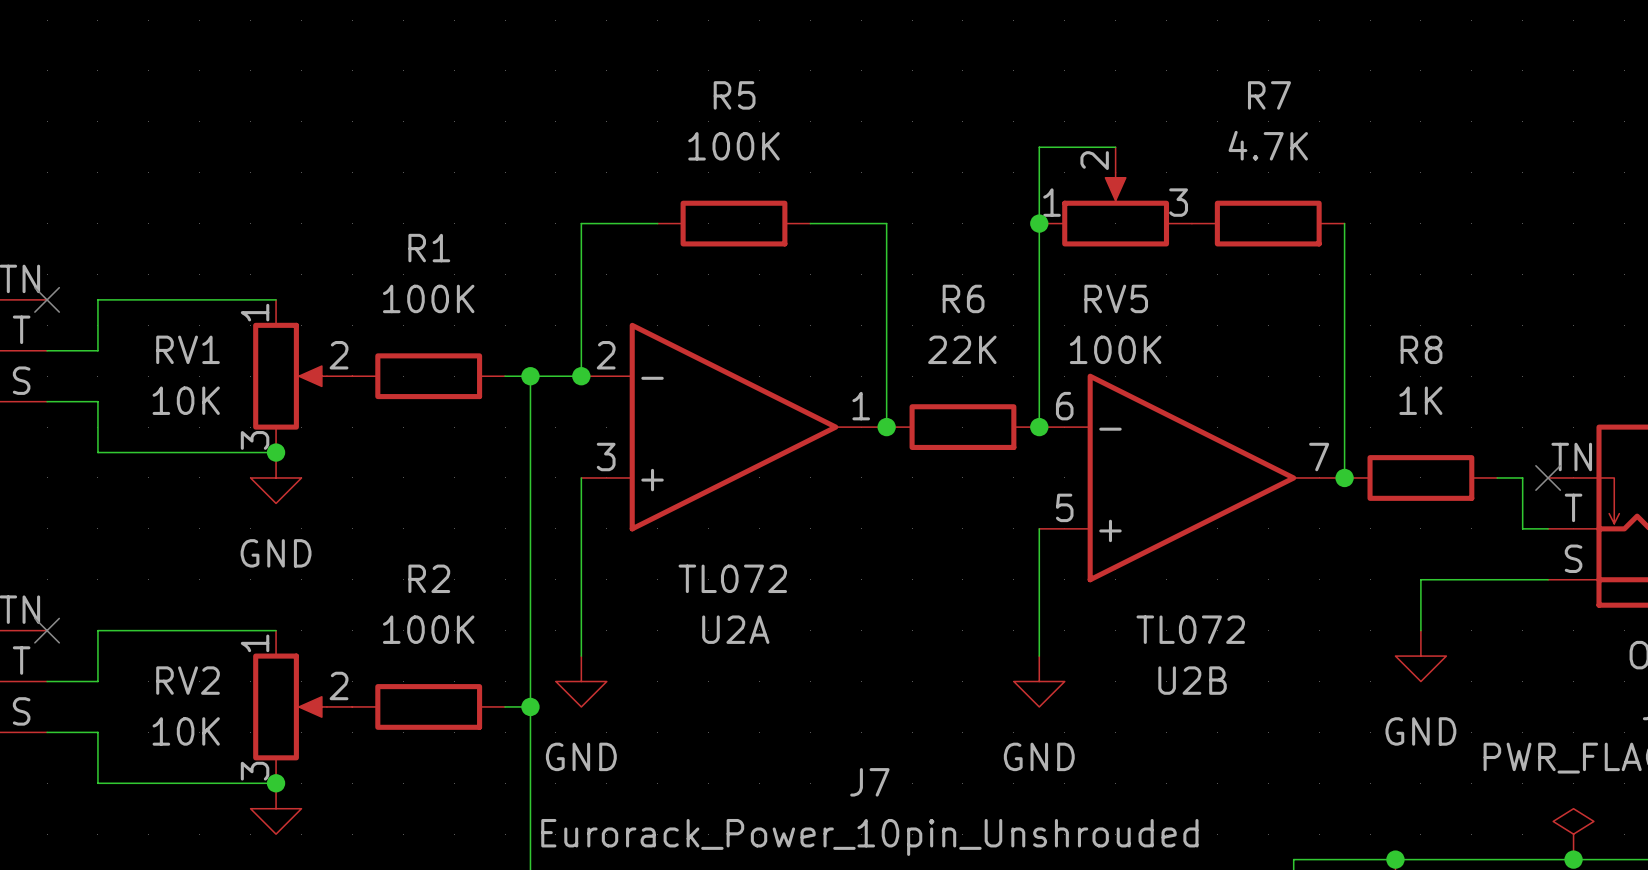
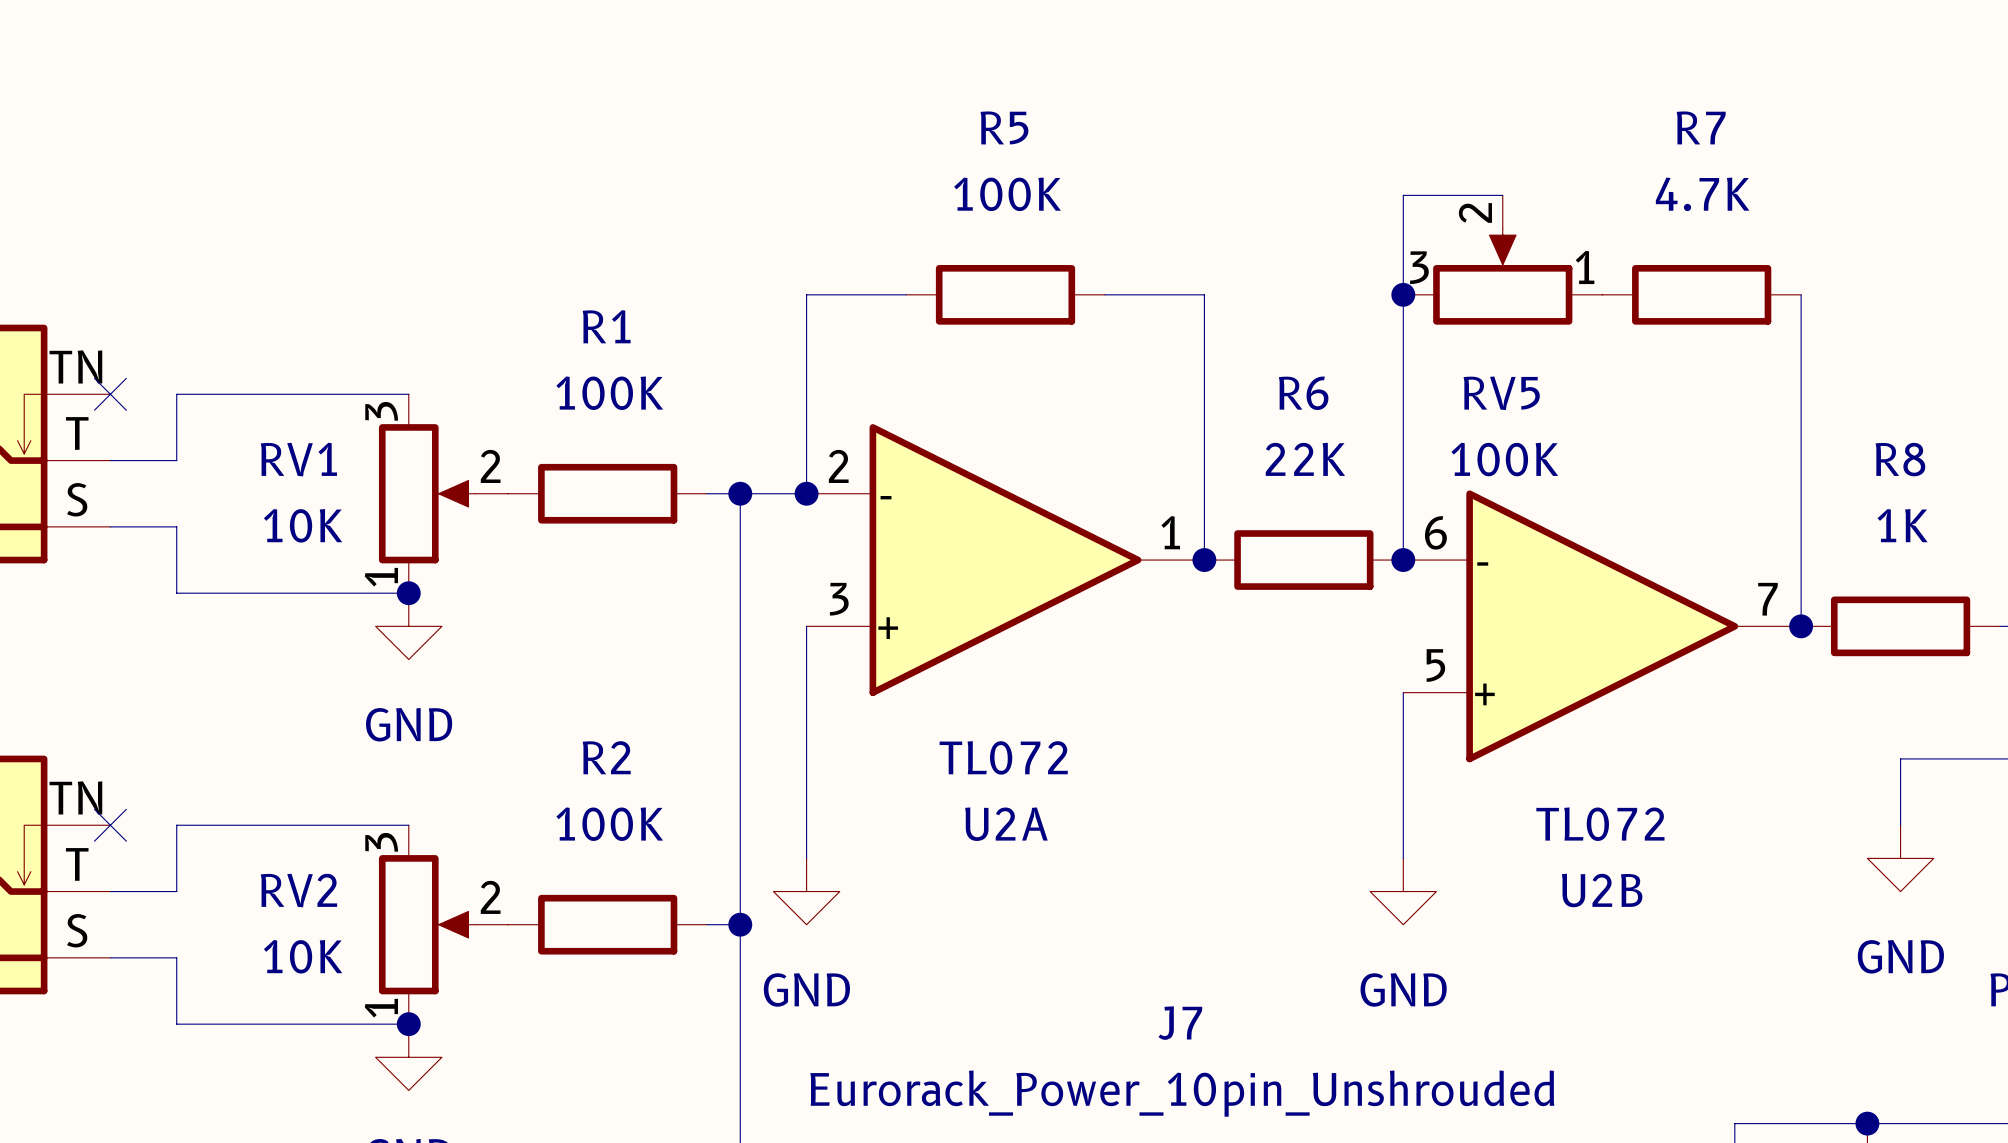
RV5 flip: as is (1115, 209) -> left-right (1502, 276)
RV1 flip: as is (290, 376) -> up-down (427, 493)
RV2 flip: as is (290, 706) -> up-down (427, 924)

